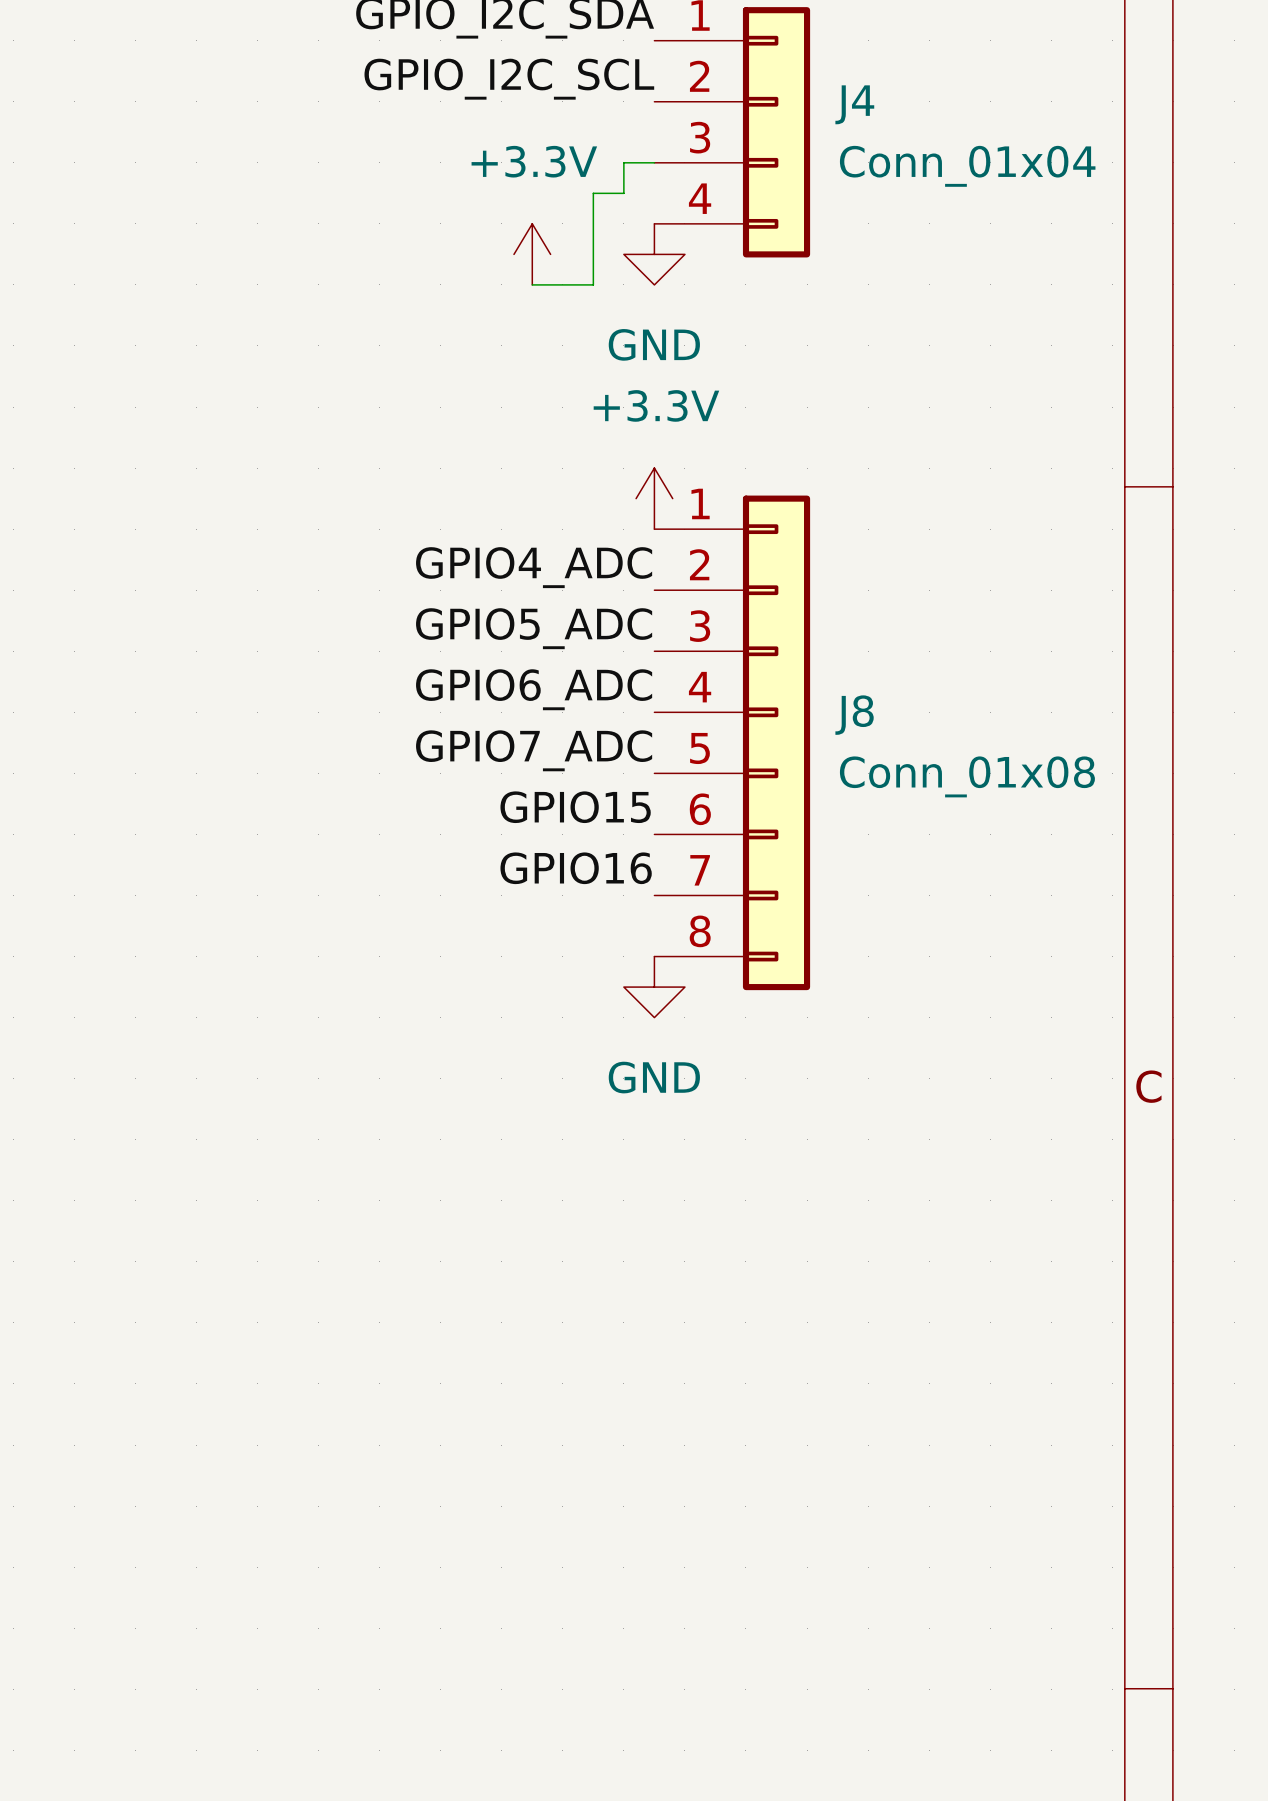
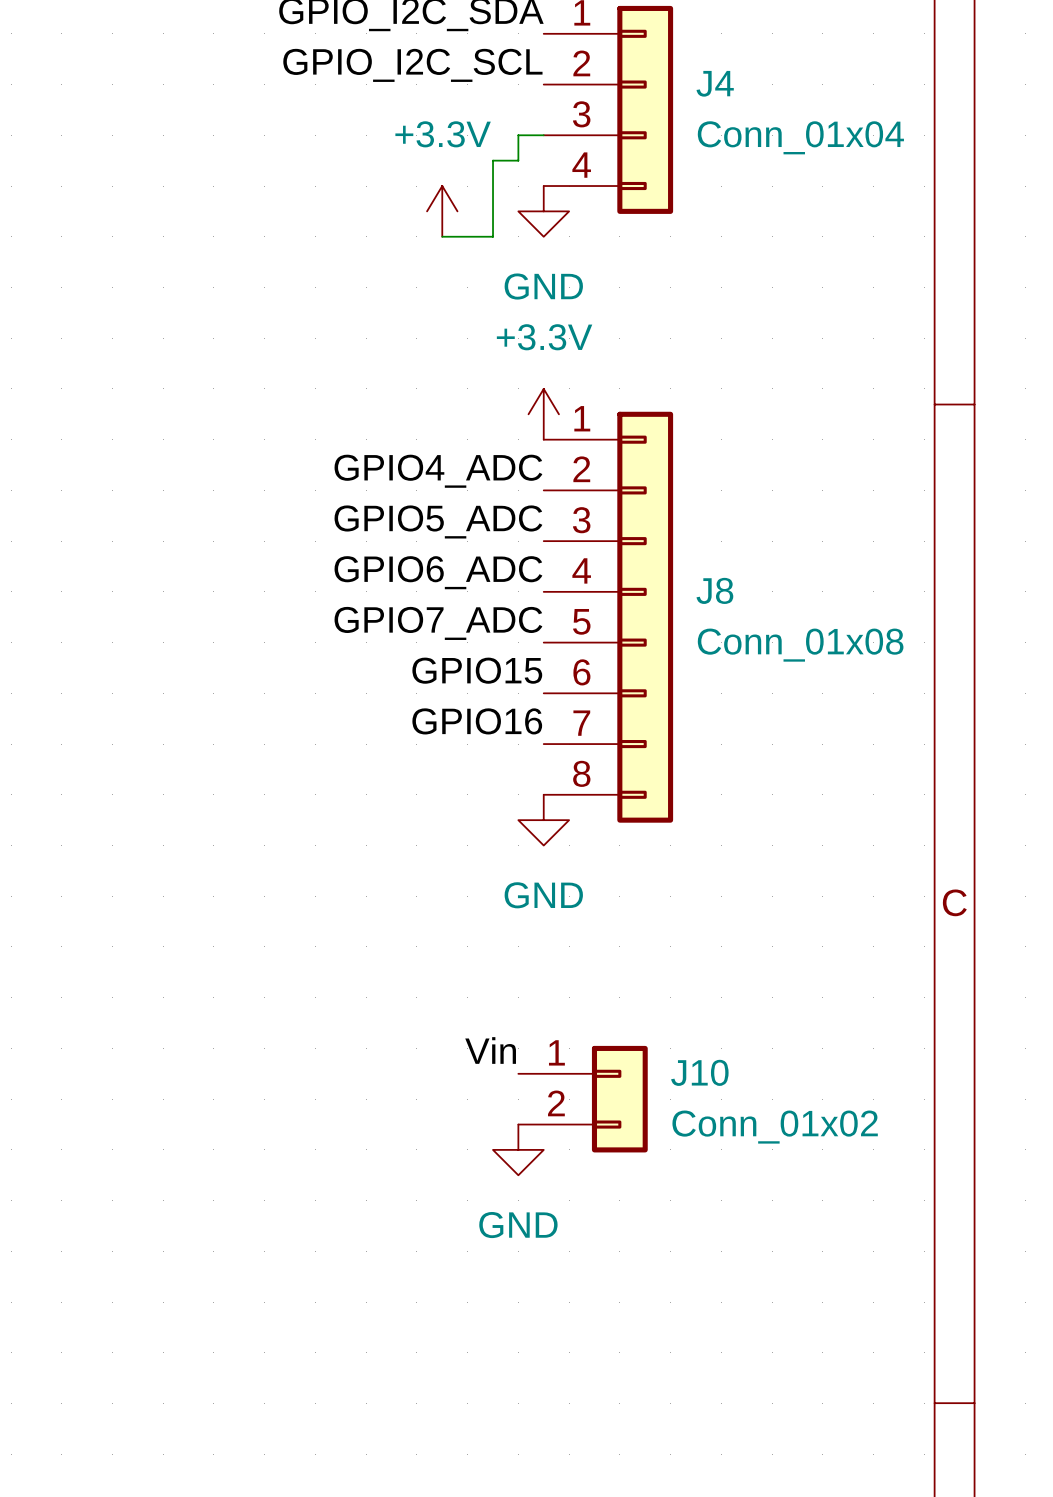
label: none -> Vin (490, 1050)
J10: none -> Conn_01x02 (583, 1099)
power symbol: none -> GND (518, 1149)

